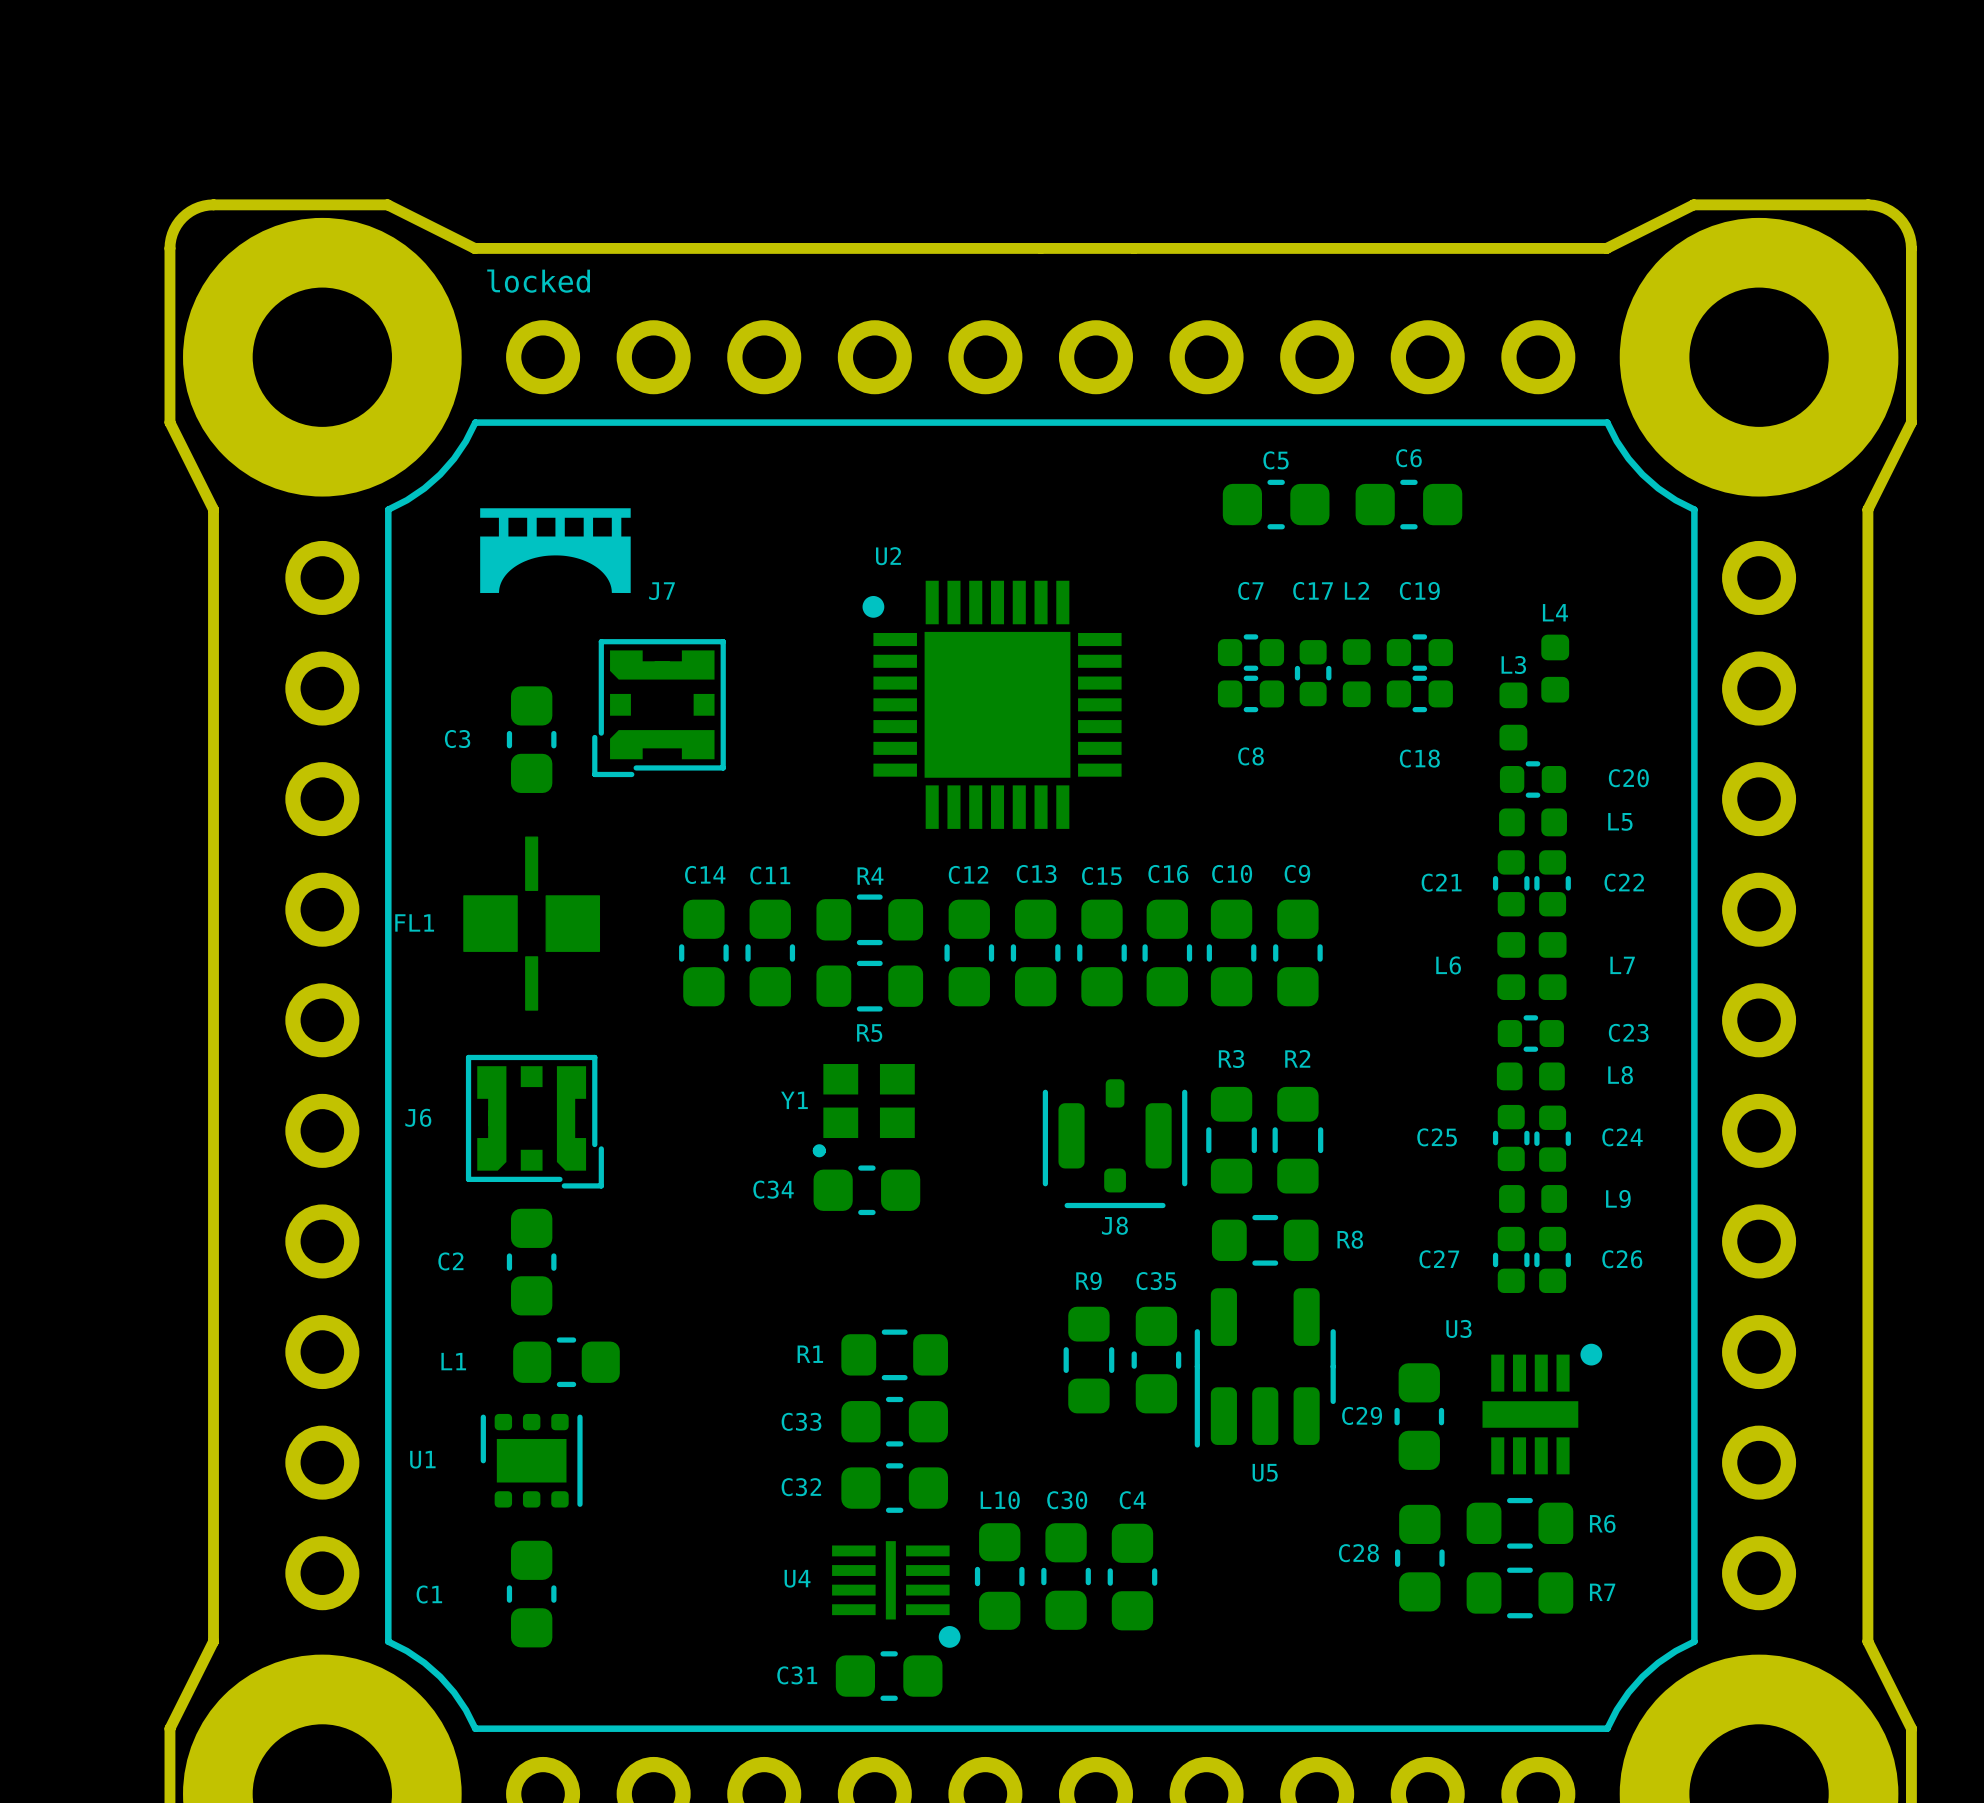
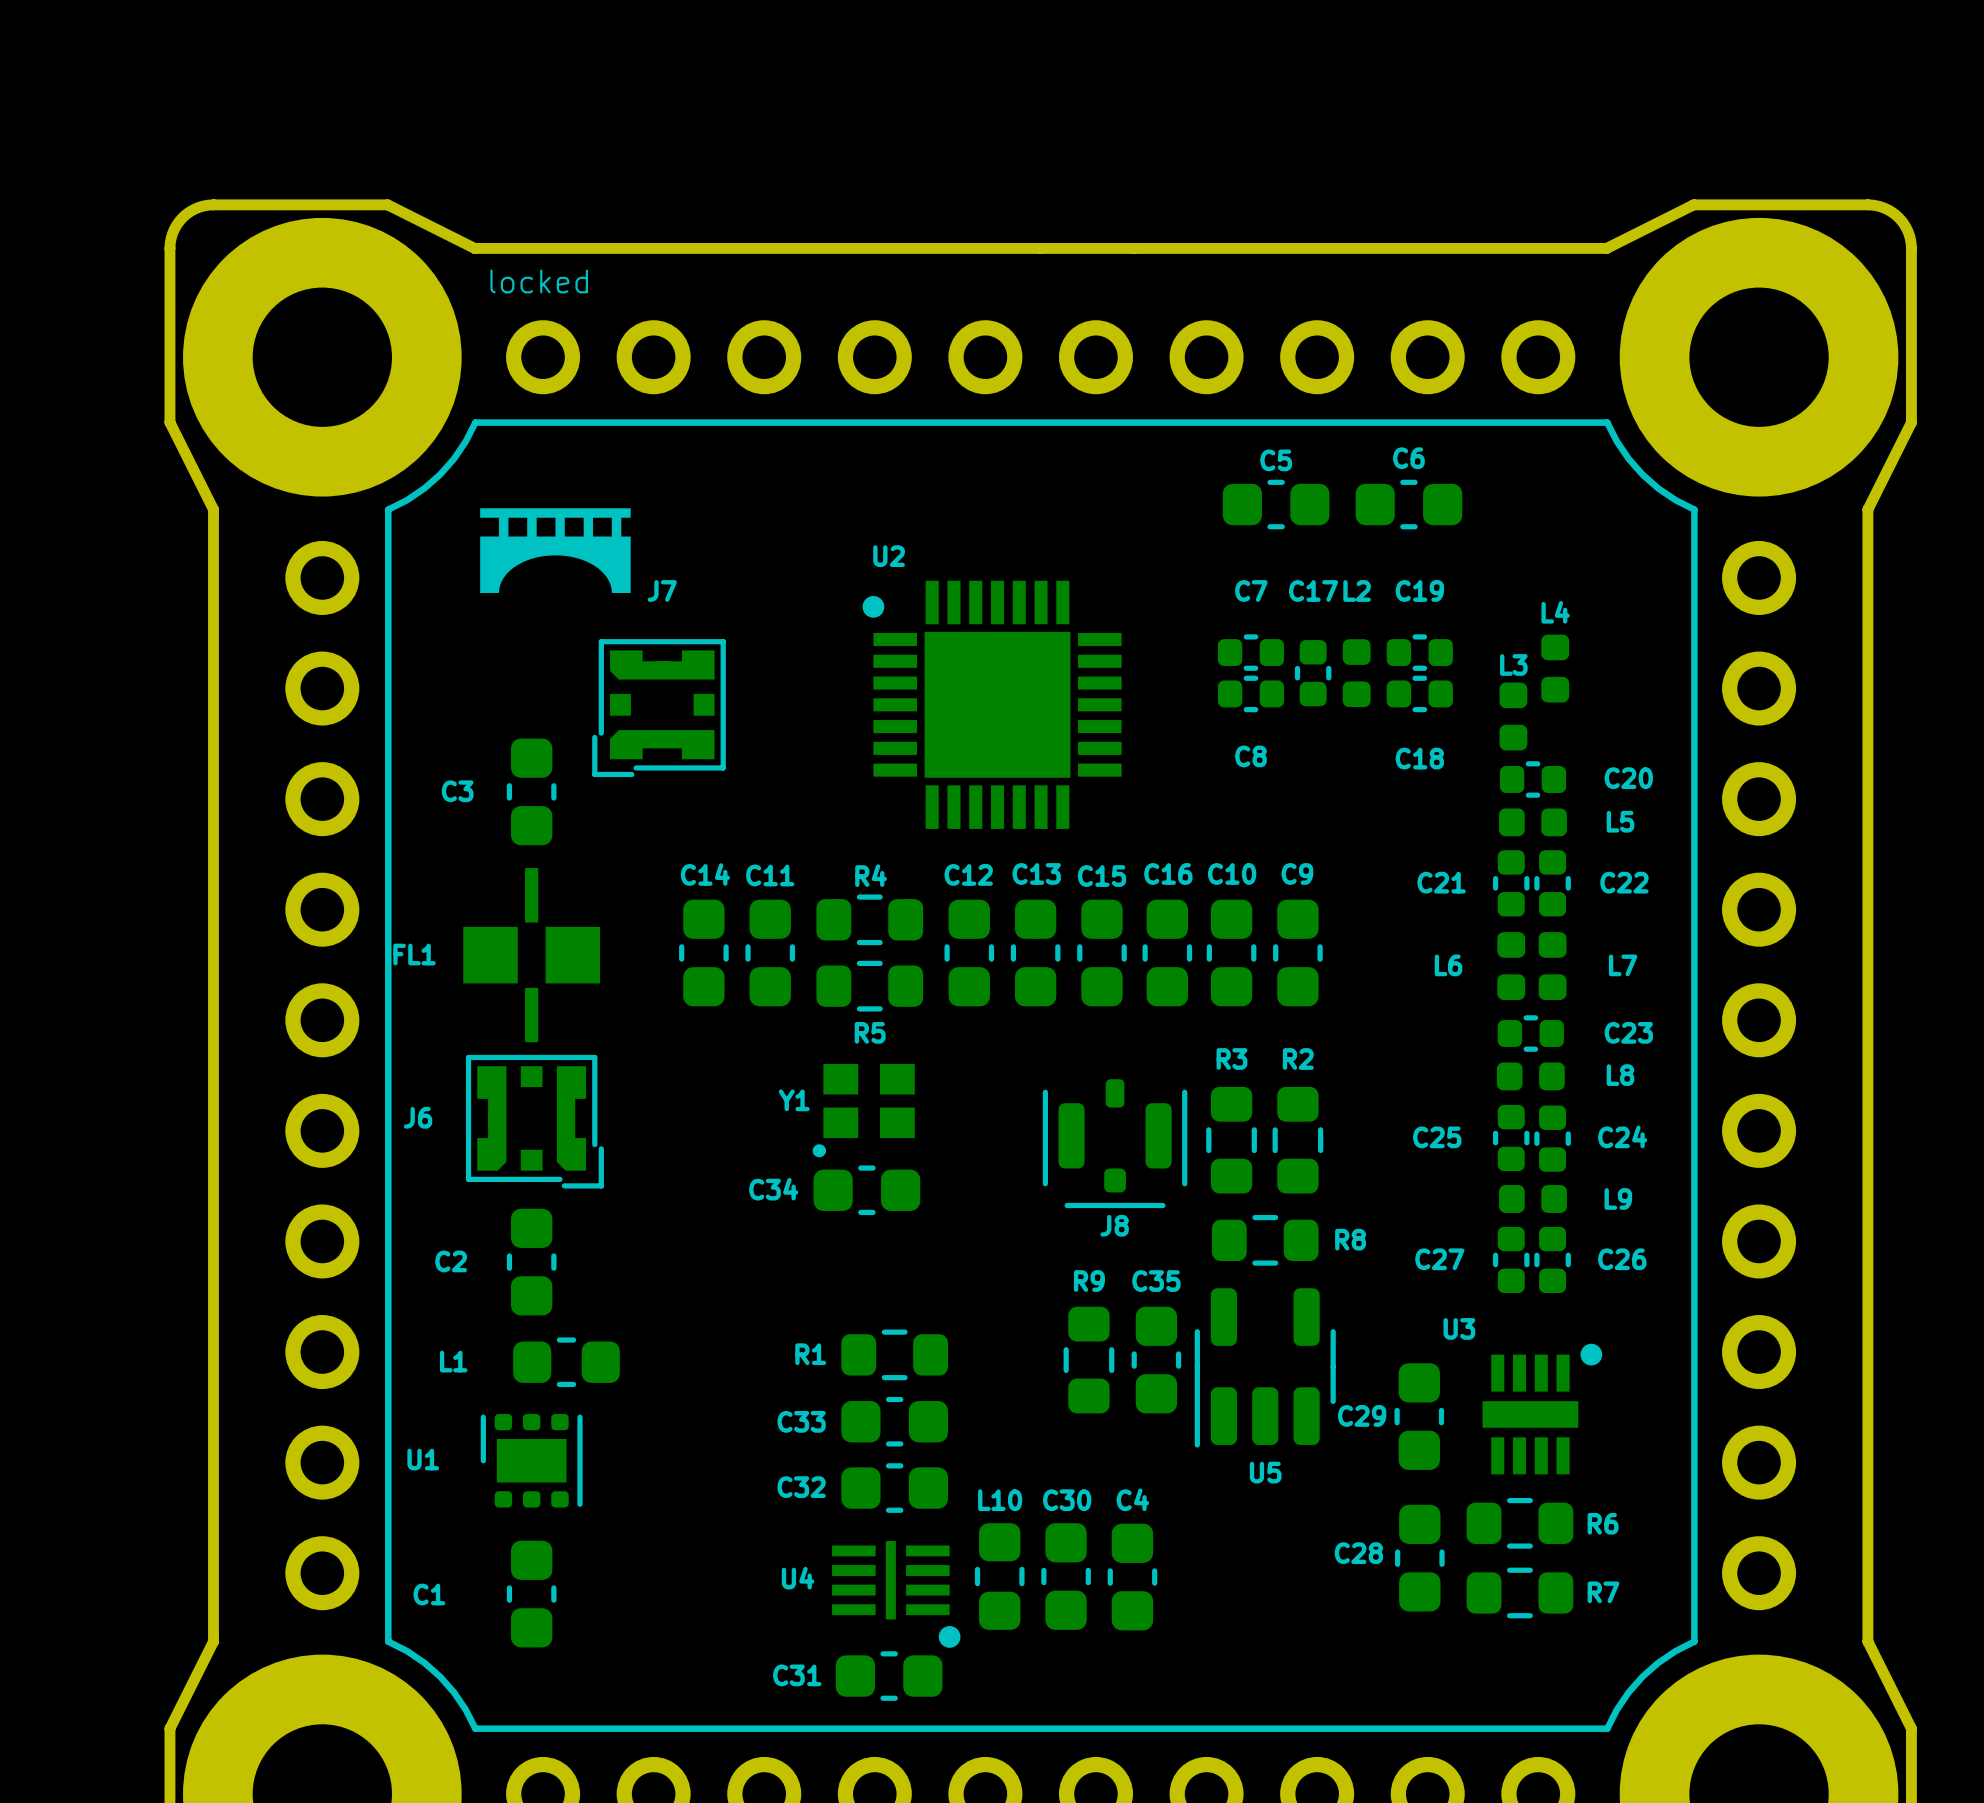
C3 position: (531, 739) -> (531, 791)
FL1 position: (531, 923) -> (531, 955)

